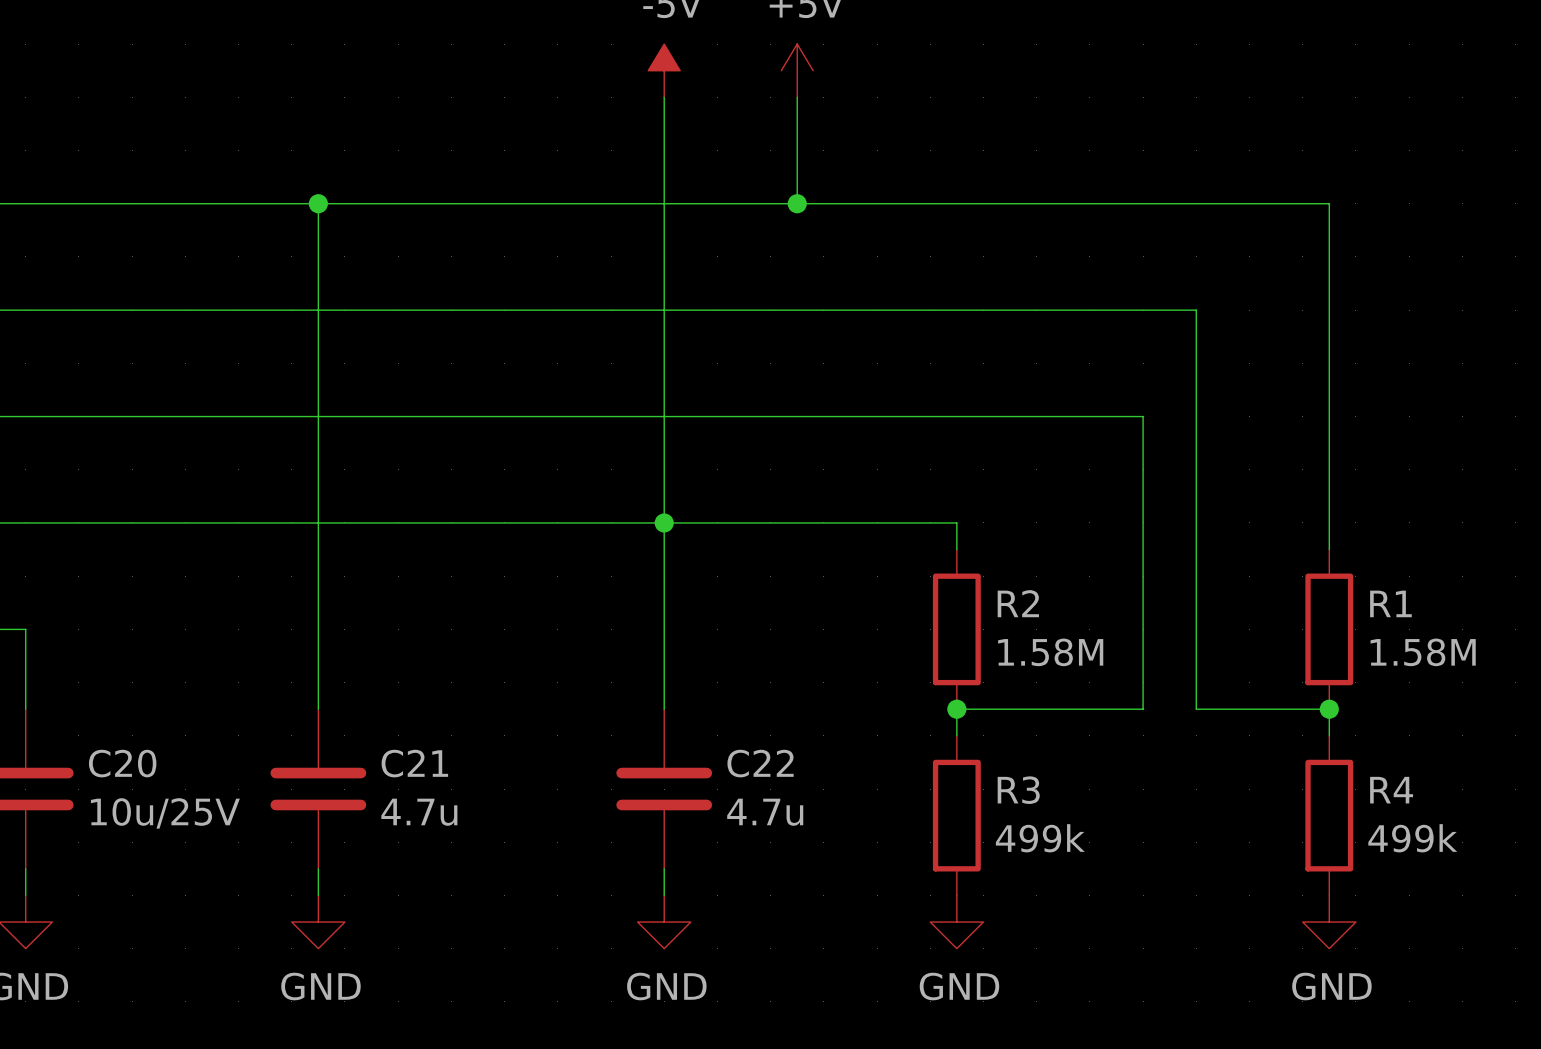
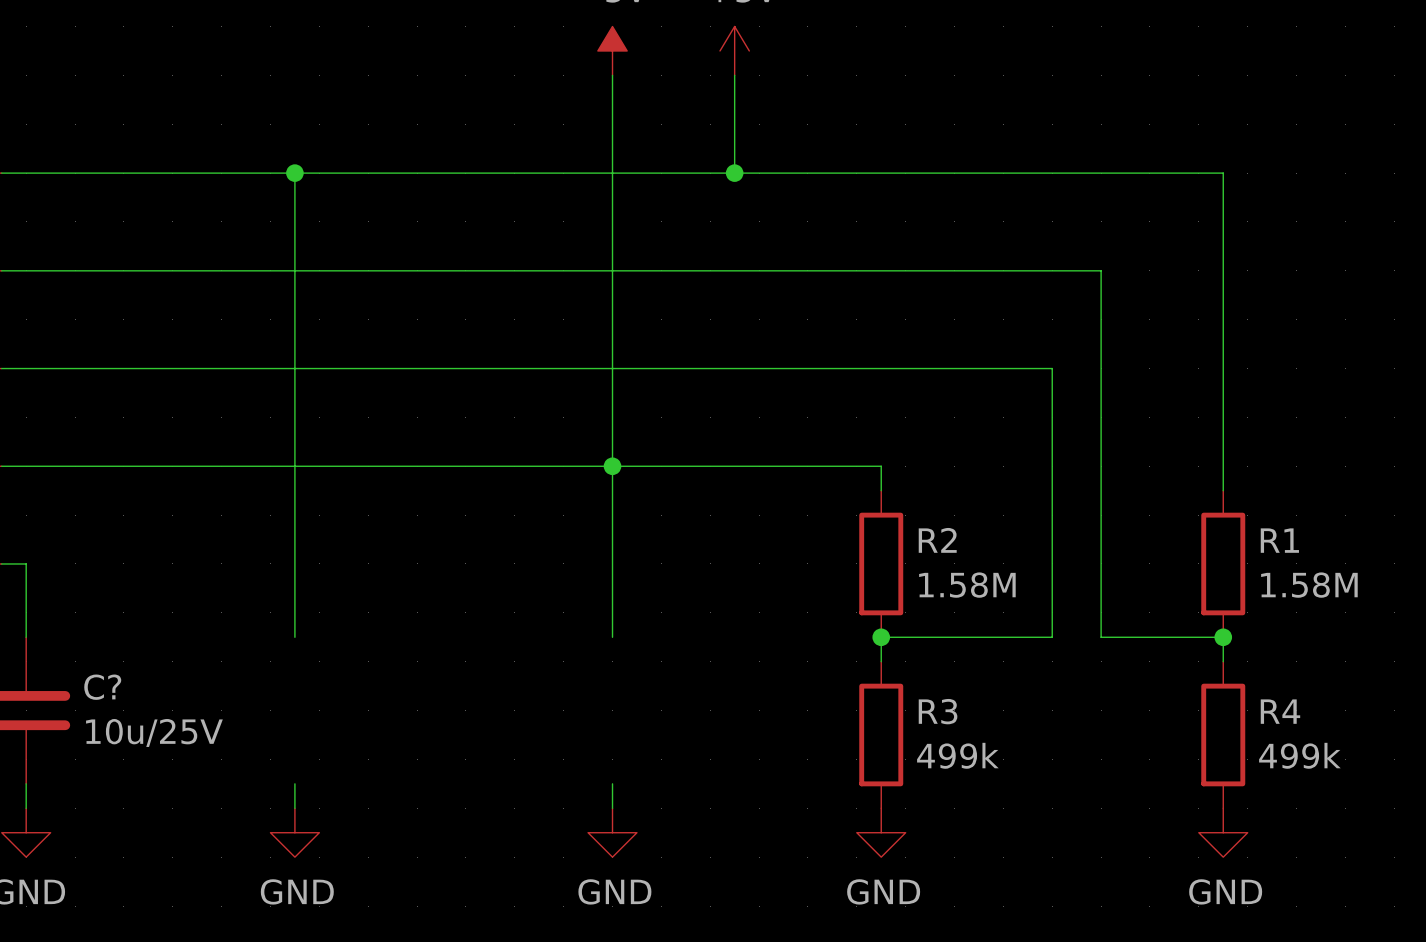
C20 name: C20 (122, 763) -> C? (102, 687)
C21: 4.7u (318, 789) -> none
C22: 4.7u (664, 789) -> none

